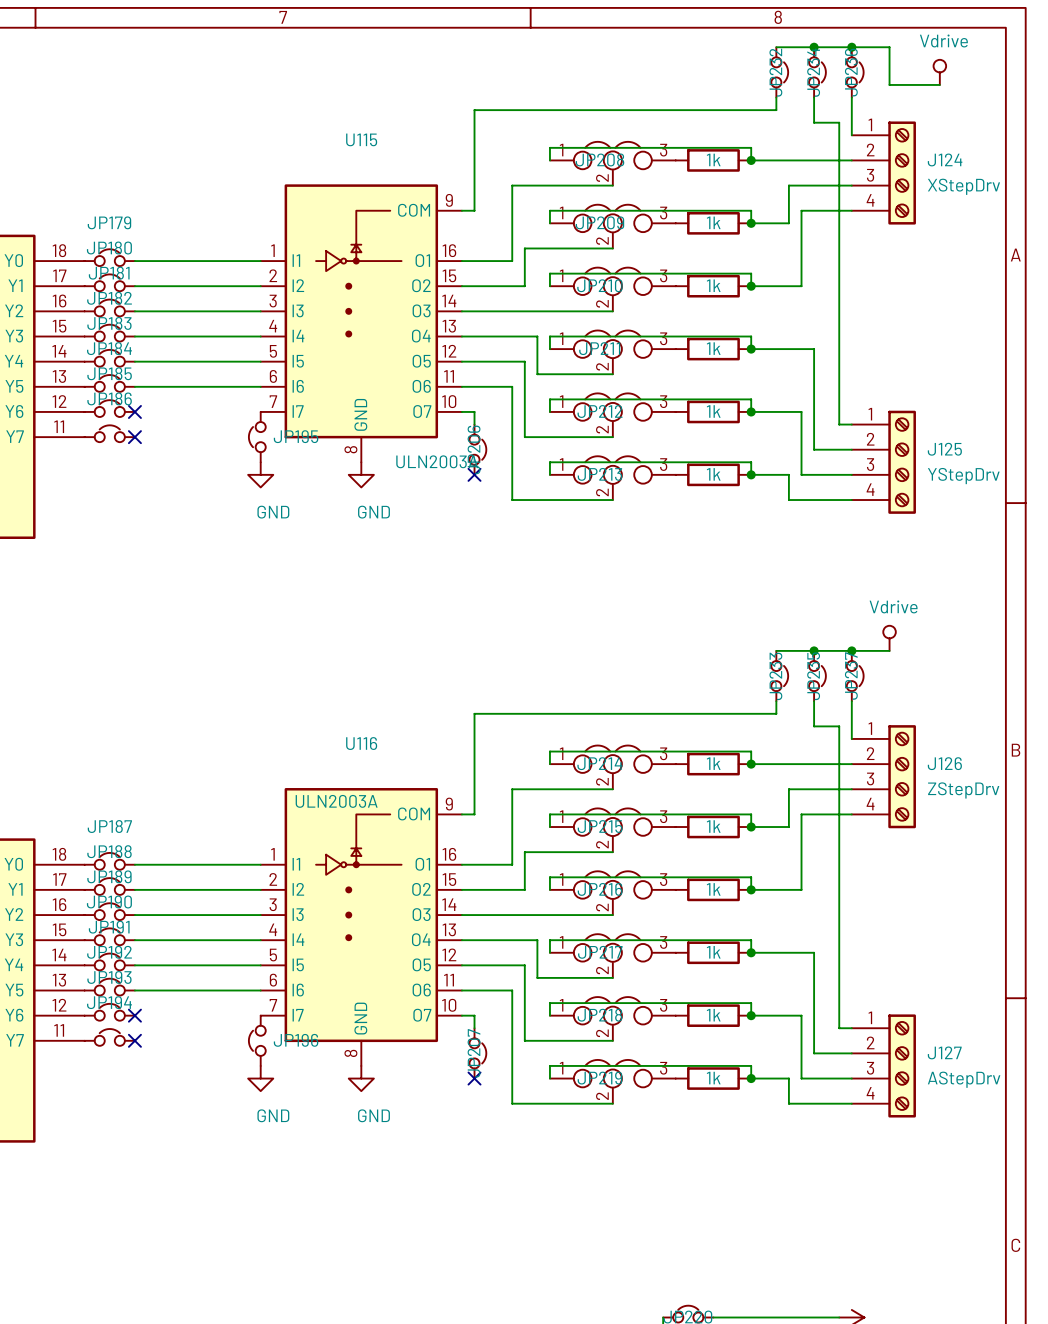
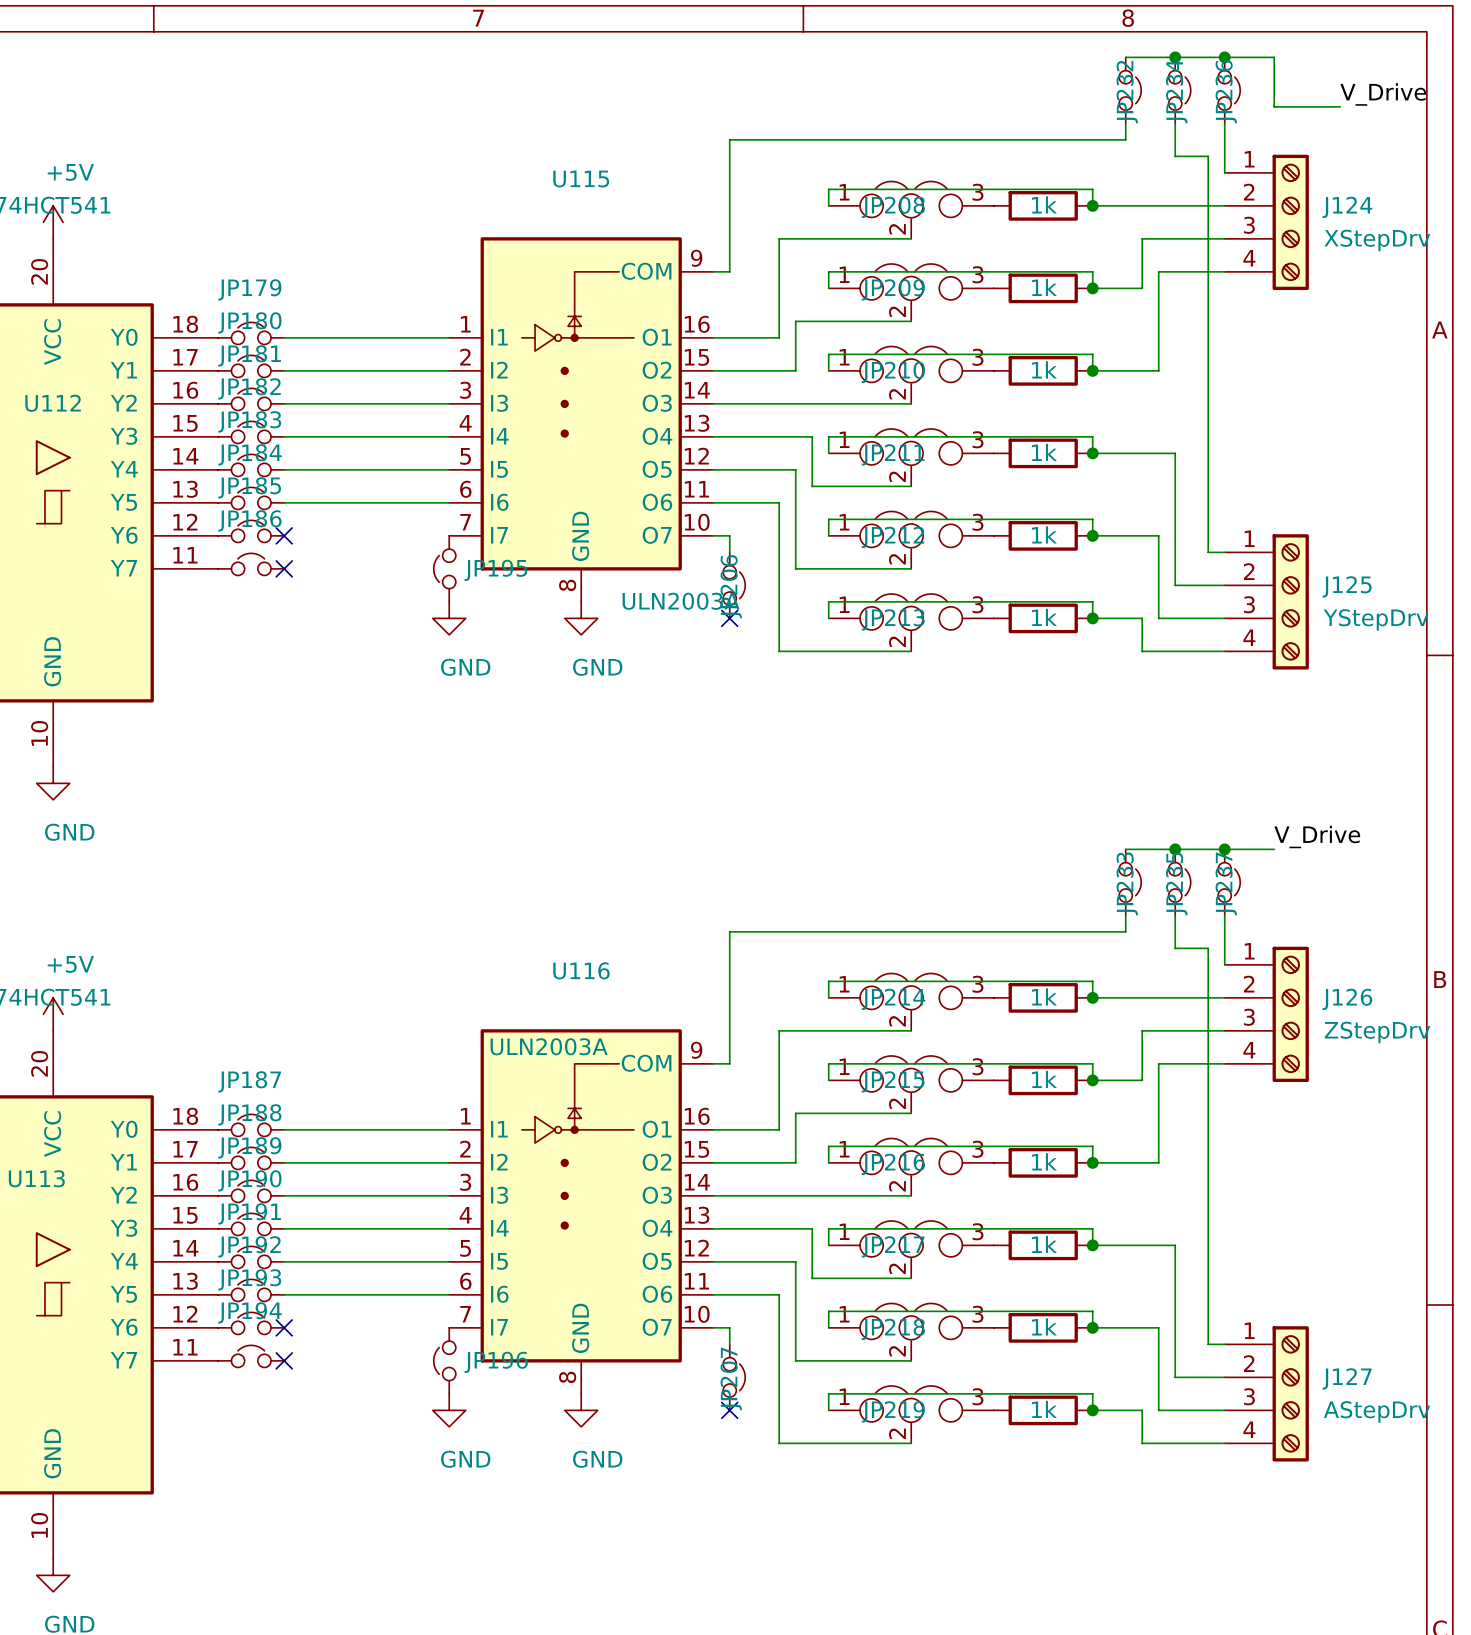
power symbol: Vdrive (939, 72) -> none
label: none -> V_Drive (1383, 94)
power symbol: Vdrive (889, 638) -> none
label: none -> V_Drive (1317, 836)

